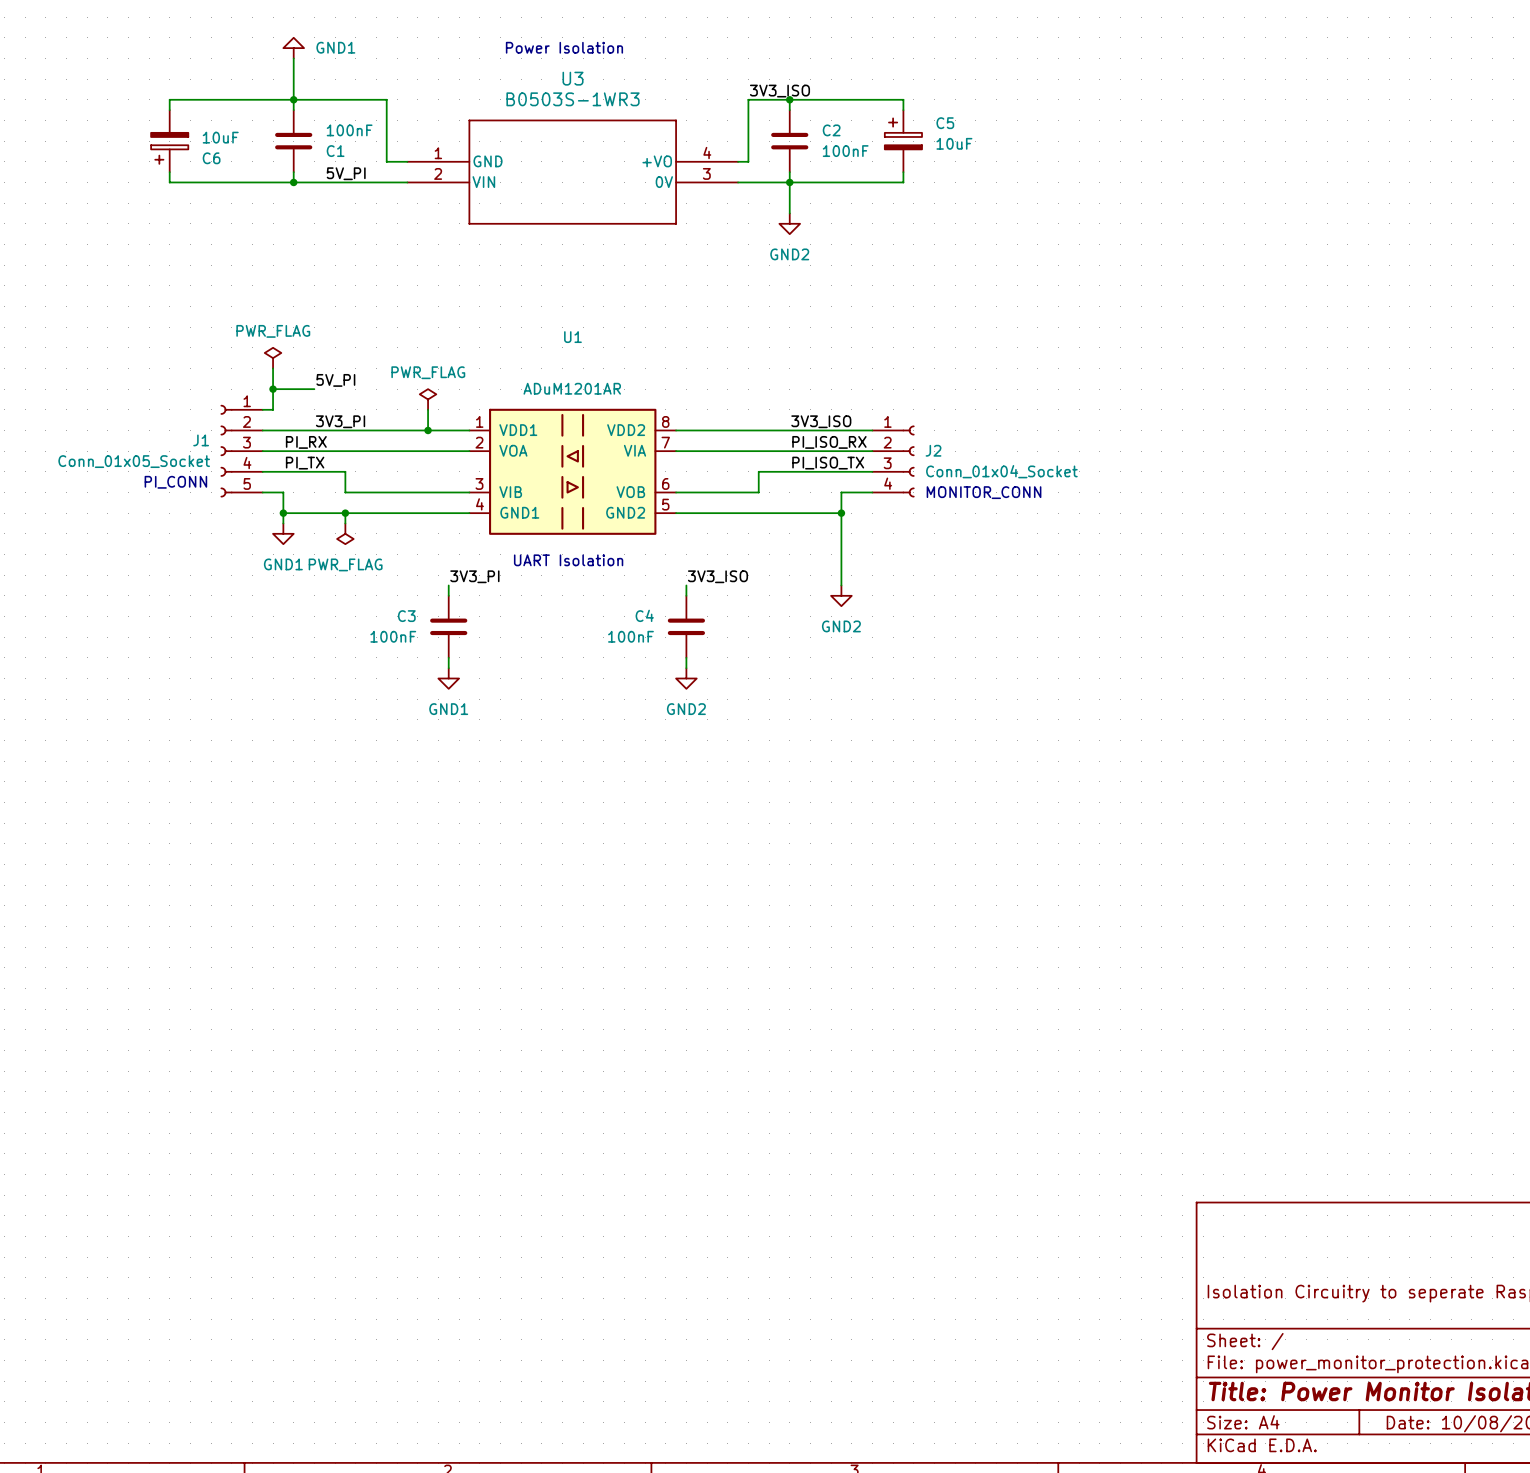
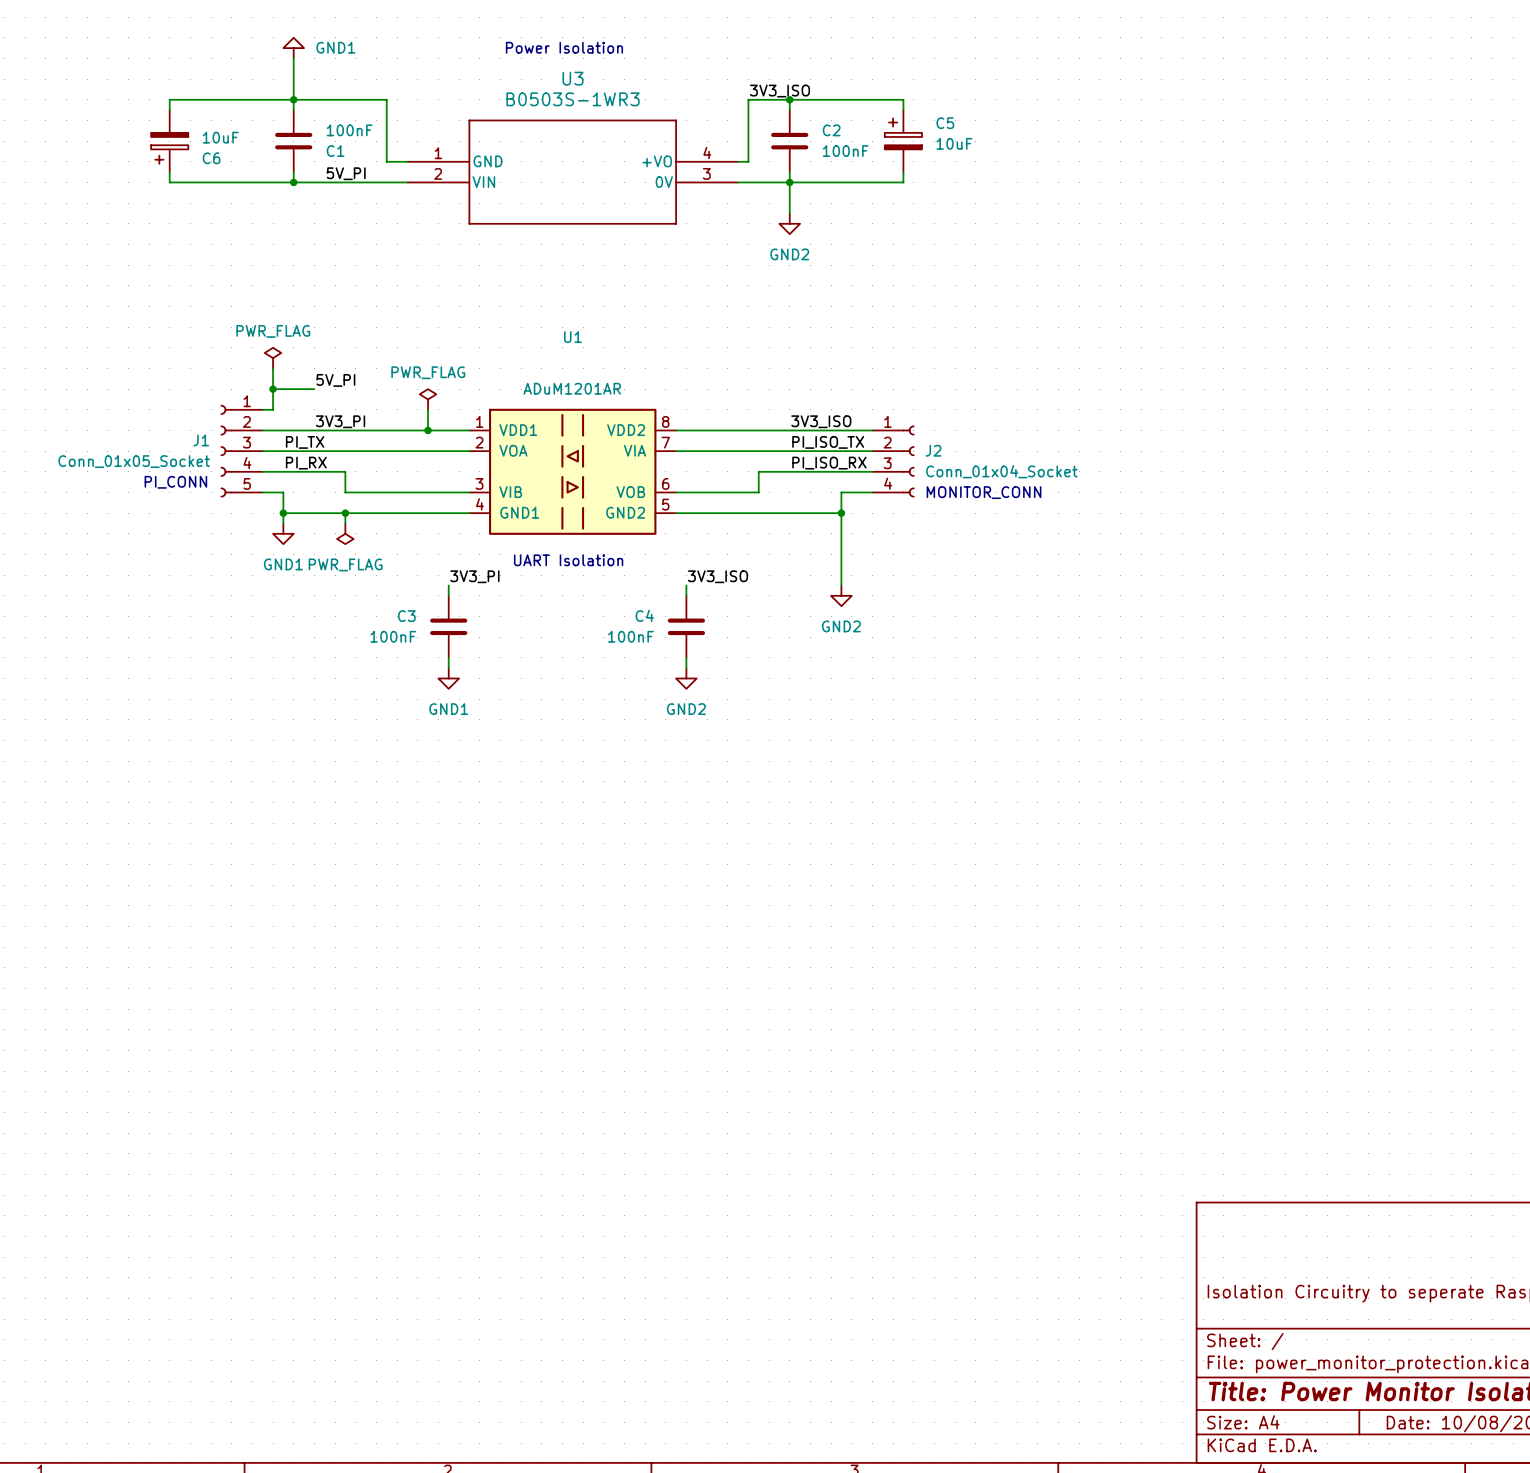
label: PI_RX (306, 442) -> PI_TX (305, 442)
label: PI_ISO_RX (829, 442) -> PI_ISO_TX (828, 442)
label: PI_TX (305, 463) -> PI_RX (306, 463)
label: PI_ISO_TX (828, 463) -> PI_ISO_RX (829, 463)

